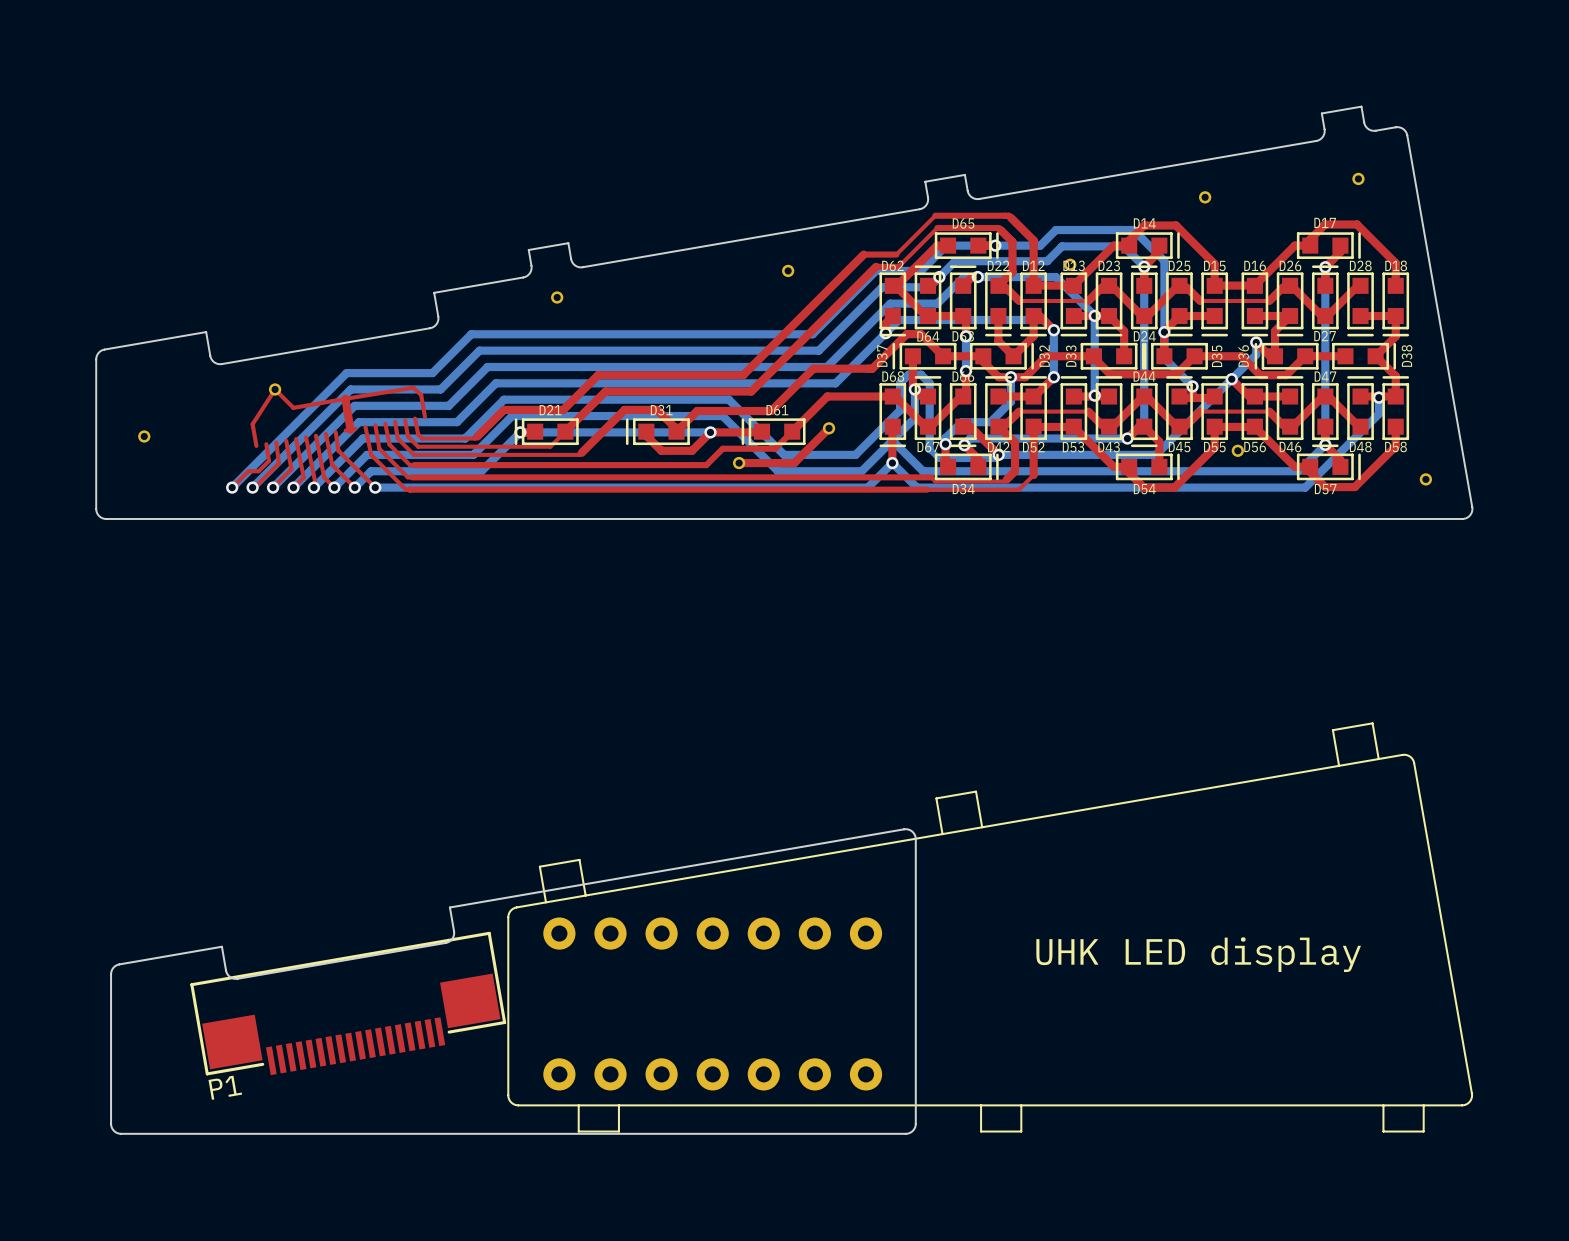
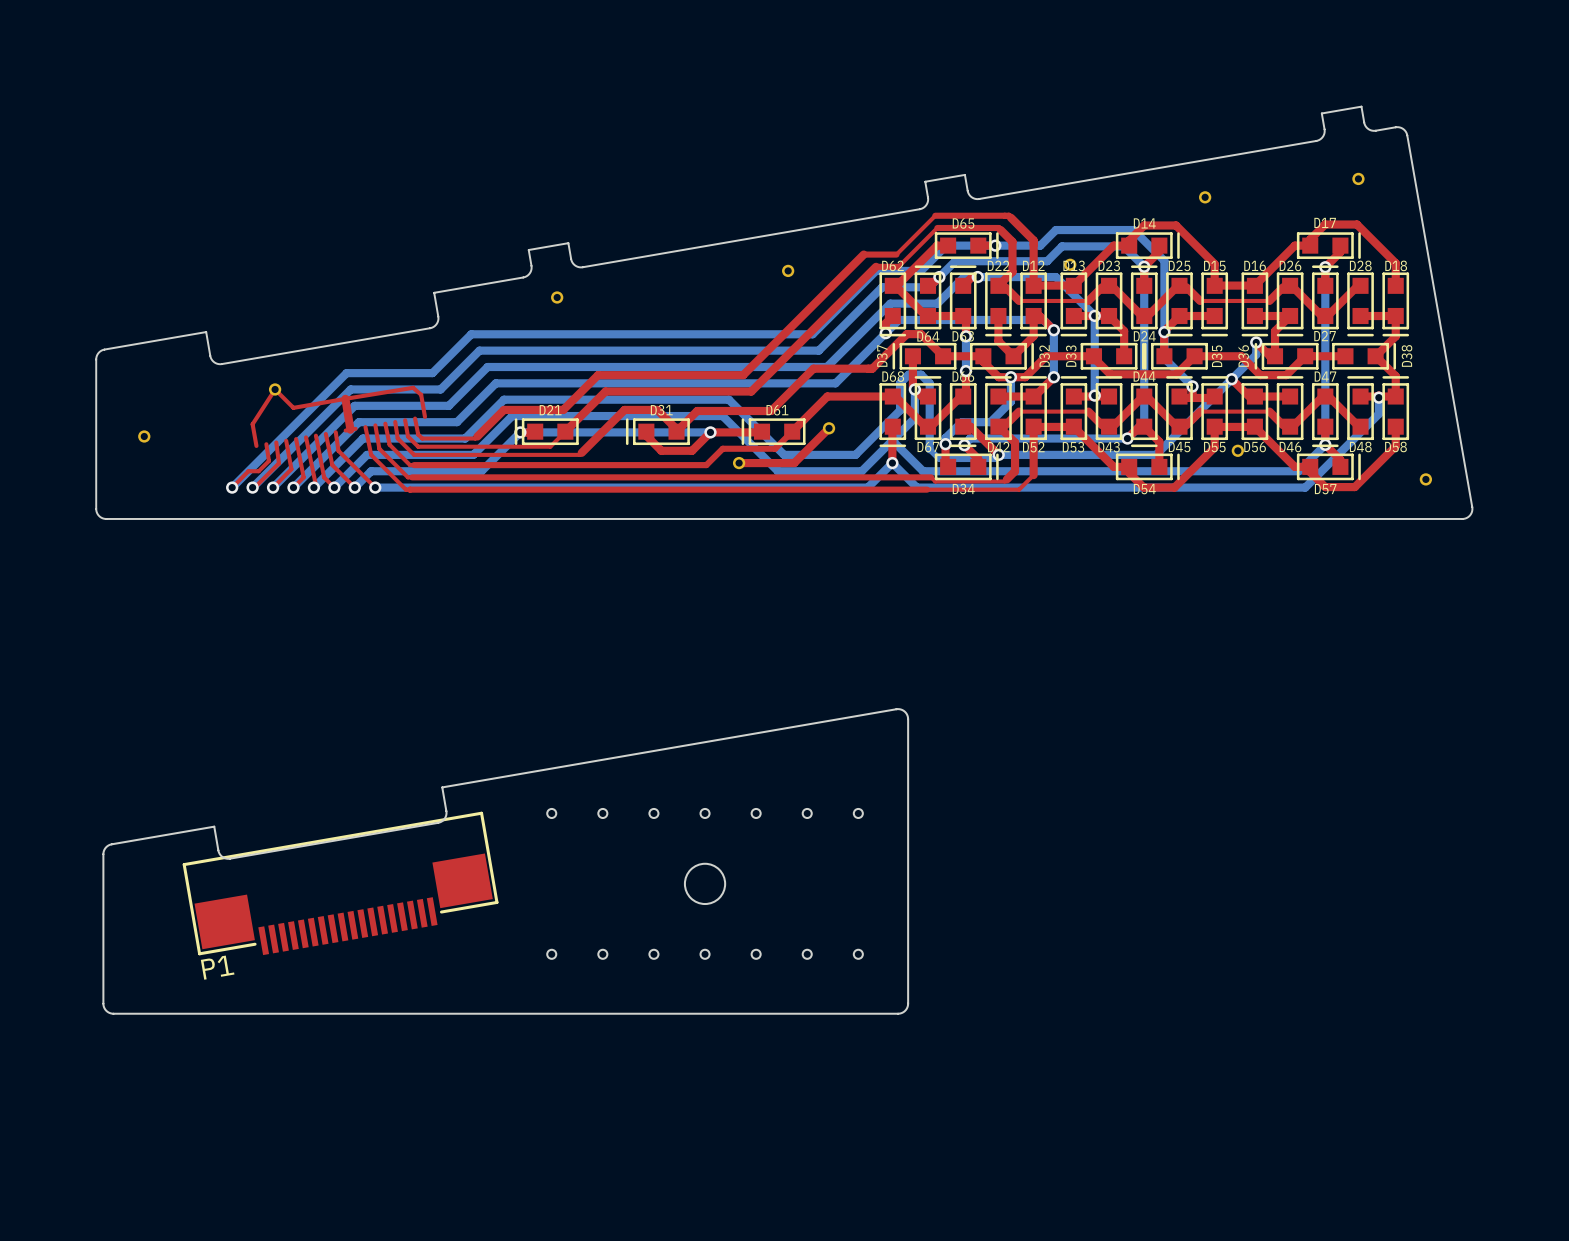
round board edge: none -> [546, 807, 558, 820]
round board edge: none -> [597, 807, 609, 820]
round board edge: none -> [648, 807, 660, 820]
round board edge: none -> [699, 807, 711, 820]
round board edge: none -> [750, 807, 762, 820]
round board edge: none -> [801, 807, 813, 820]
round board edge: none -> [852, 807, 864, 820]
board edge: (904, 829) (449, 907) (454, 933) (451, 939) (445, 942) (236, 978) (231, 977) (226, 973) (221, 946) (117, 965) (112, 968) (111, 974) (111, 1127) (114, 1131) (121, 1133) (909, 1133) (913, 1129) (915, 1123) (915, 839) (912, 831) (904, 829) -> (896, 709) (442, 787) (446, 813) (443, 819) (438, 822) (228, 858) (222, 856) (219, 852) (214, 826) (109, 844) (105, 848) (103, 854) (104, 1007) (107, 1011) (113, 1013) (901, 1012) (906, 1009) (908, 1003) (908, 719) (904, 711) (896, 709)
round board edge: none -> [683, 862, 727, 906]
UHK LED display: (990, 927) -> none
round board edge: none -> [546, 948, 558, 960]
round board edge: none -> [597, 948, 609, 960]
round board edge: none -> [648, 948, 660, 960]
round board edge: none -> [699, 948, 711, 960]
round board edge: none -> [750, 948, 762, 960]
round board edge: none -> [801, 948, 813, 960]
round board edge: none -> [852, 948, 864, 960]
P1 position: (348, 1003) -> (340, 883)

